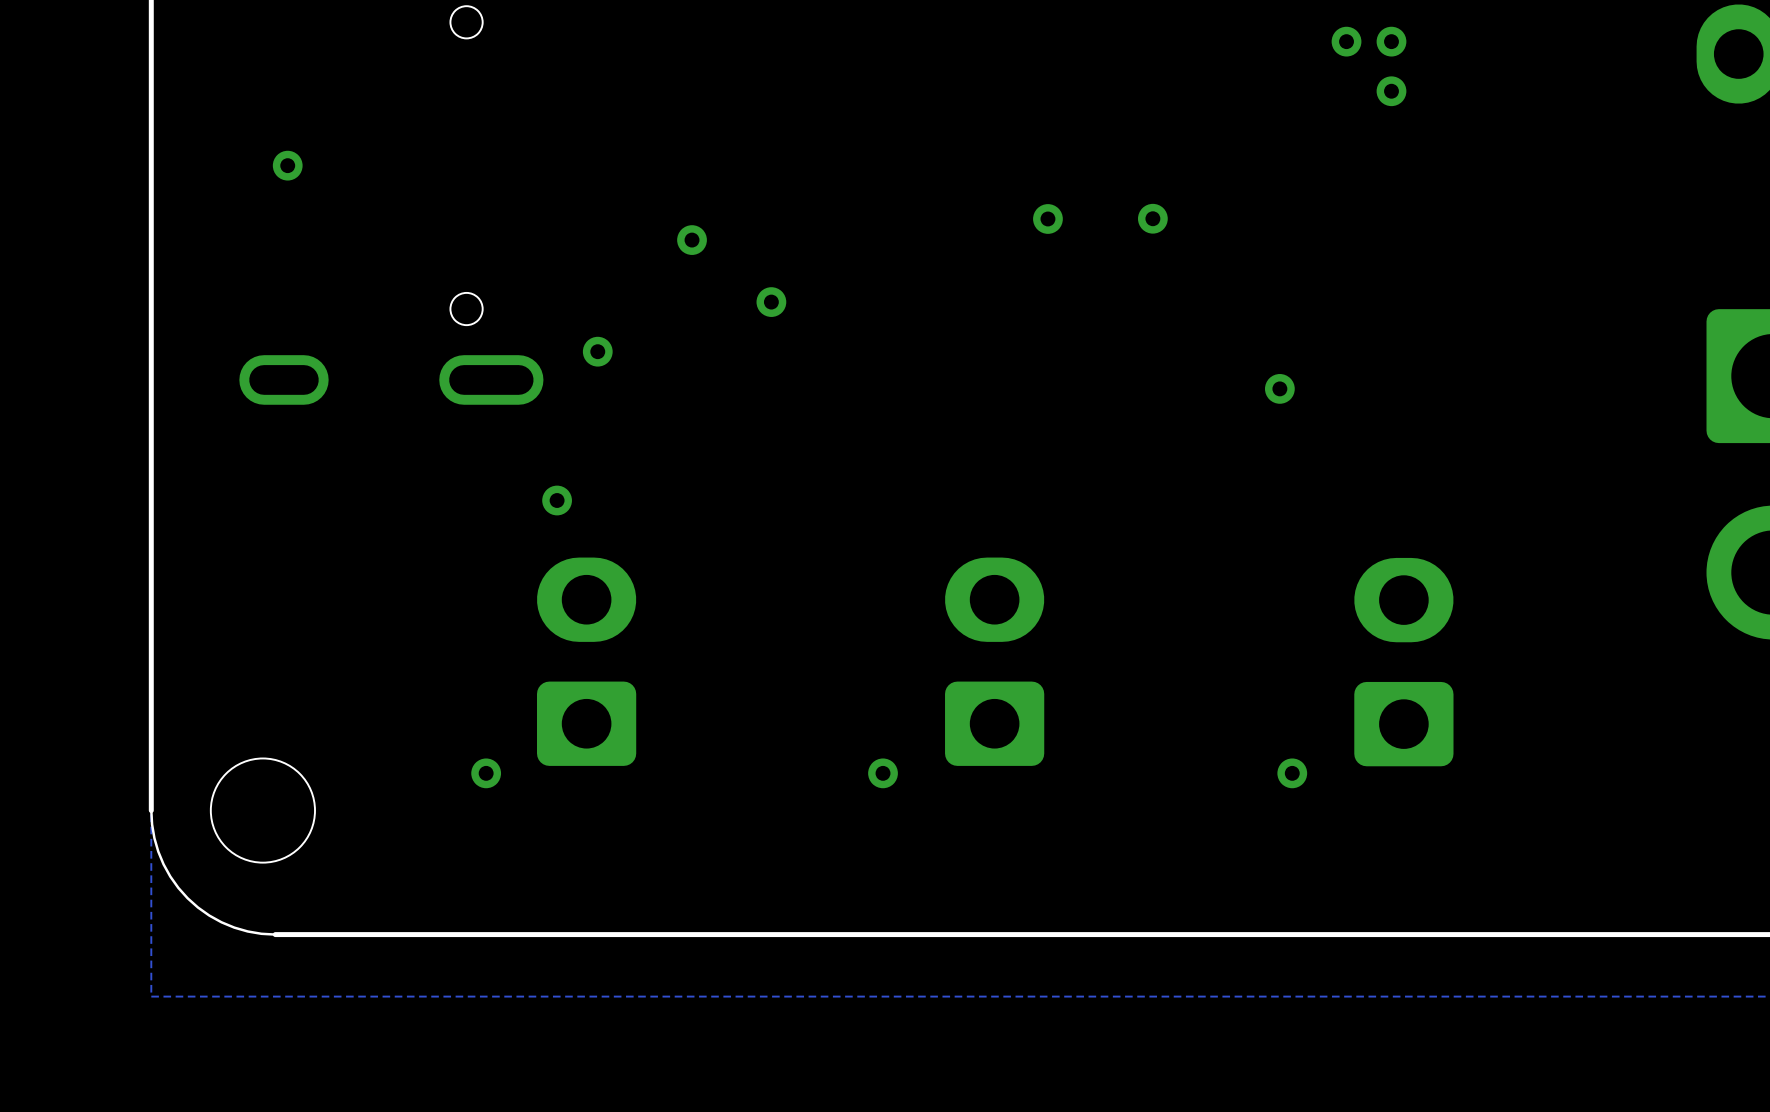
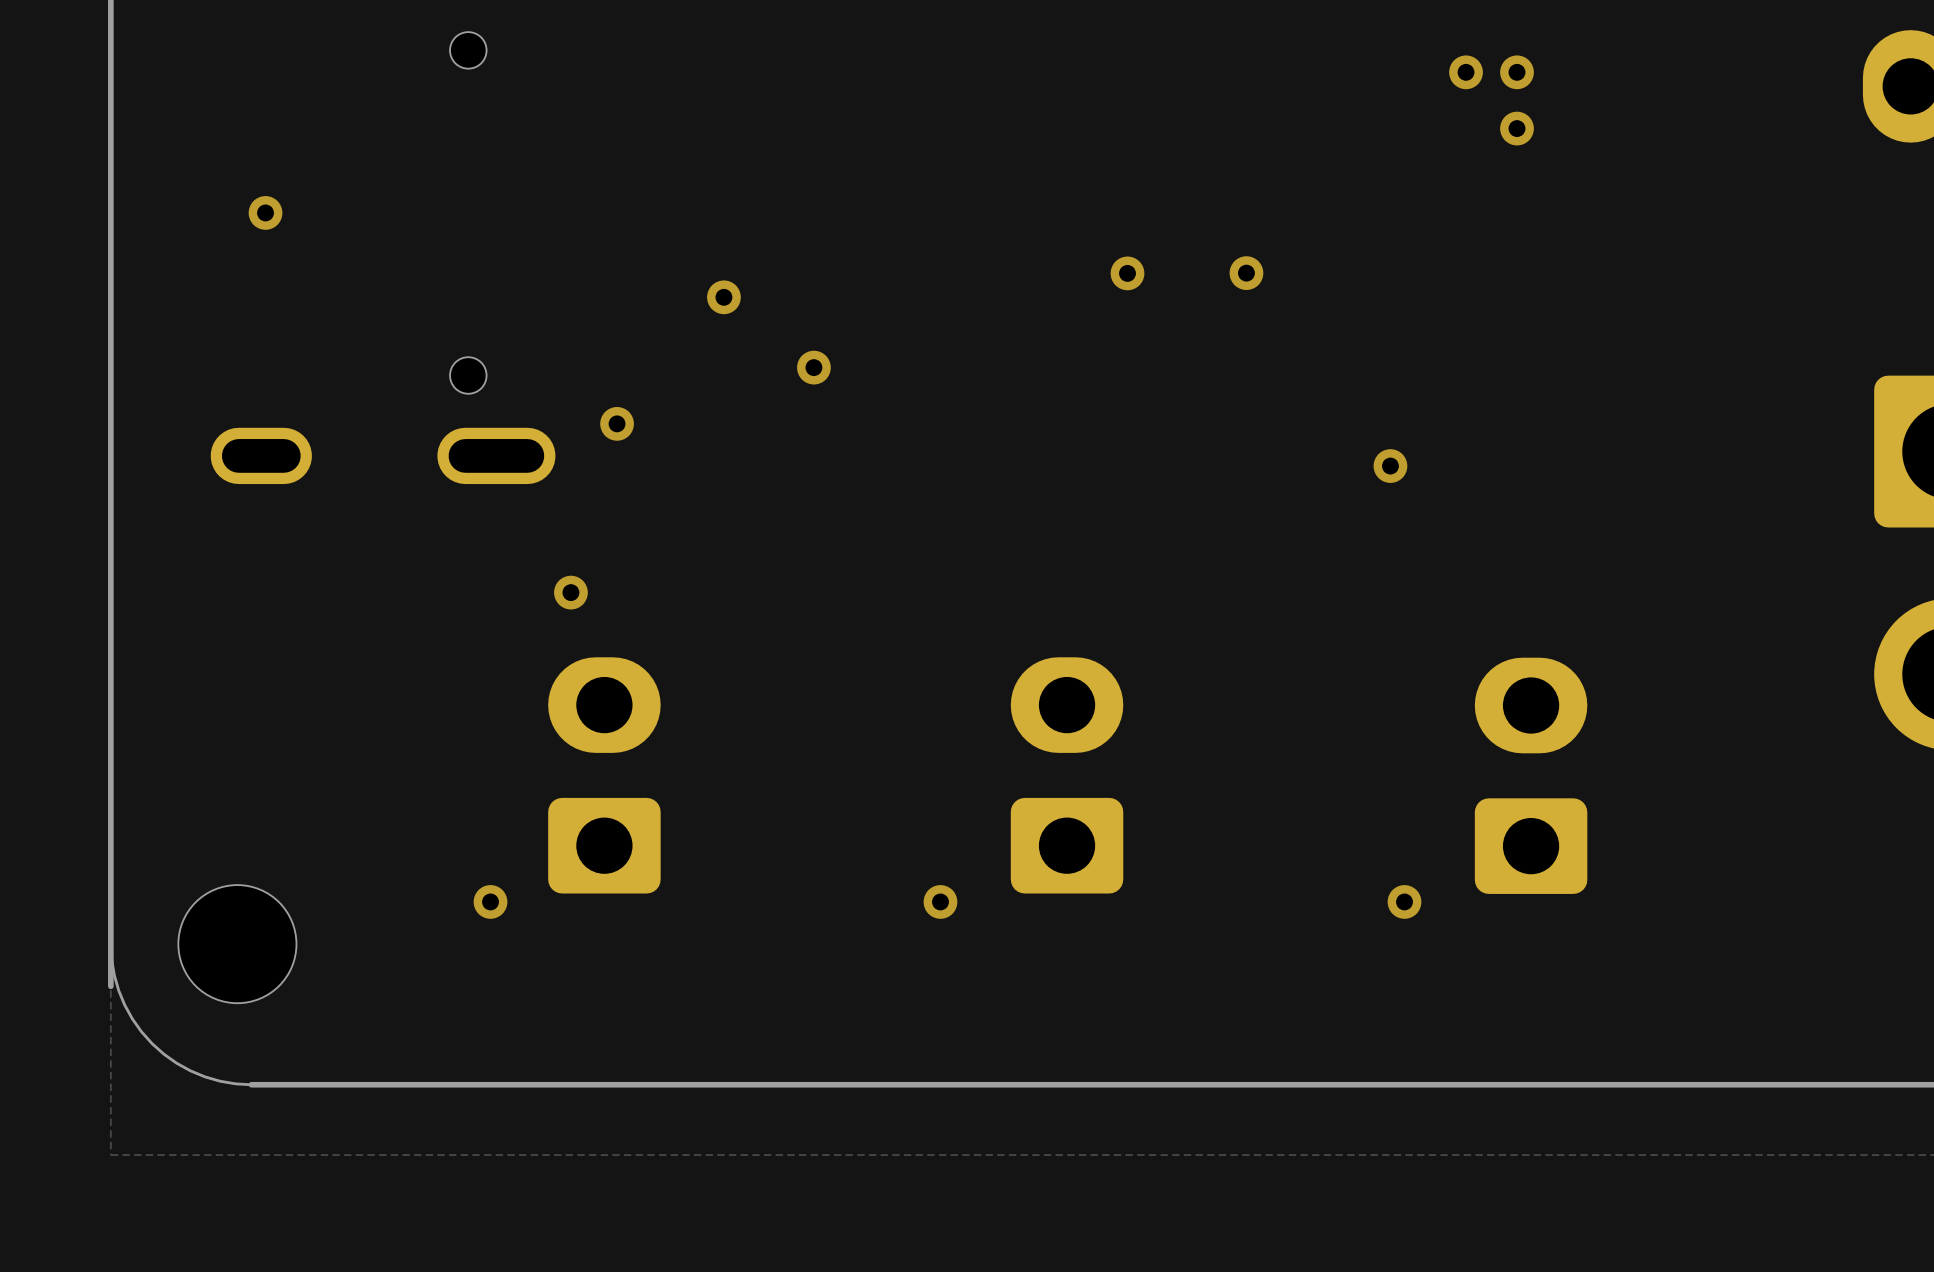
board edge: none -> (110, 944) (110, 986)

